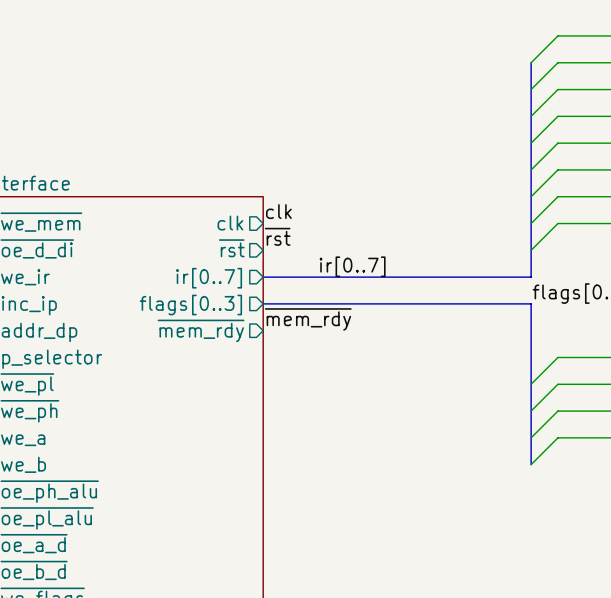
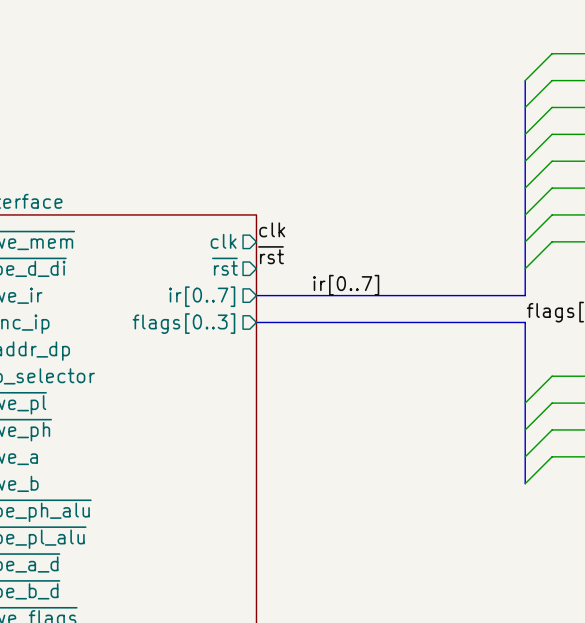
label: ~{mem_rdy} (308, 319) -> none
sheet pin: ~{mem_rdy} (201, 330) -> none

